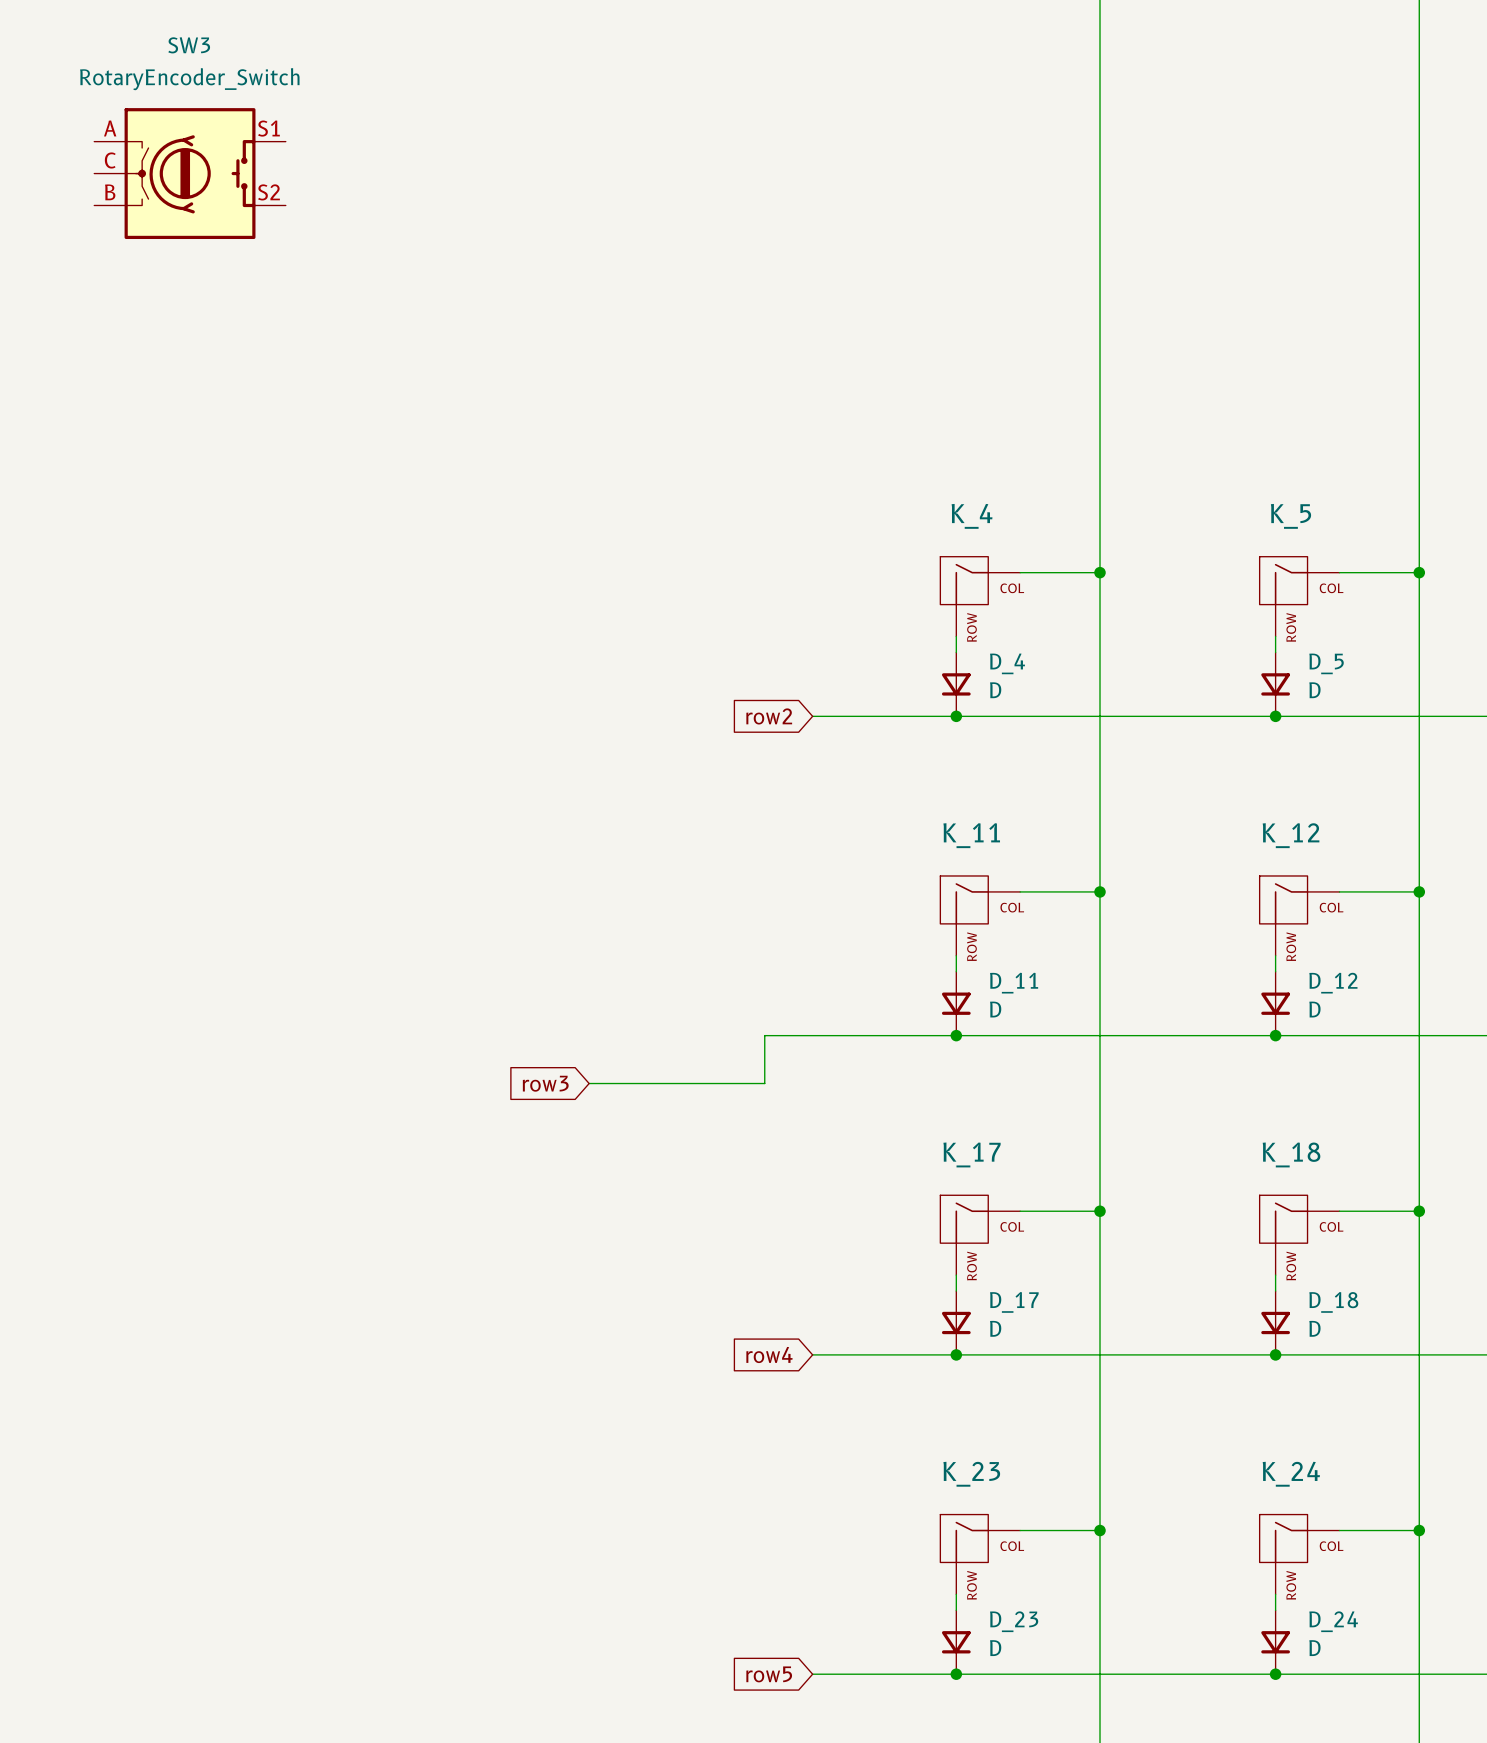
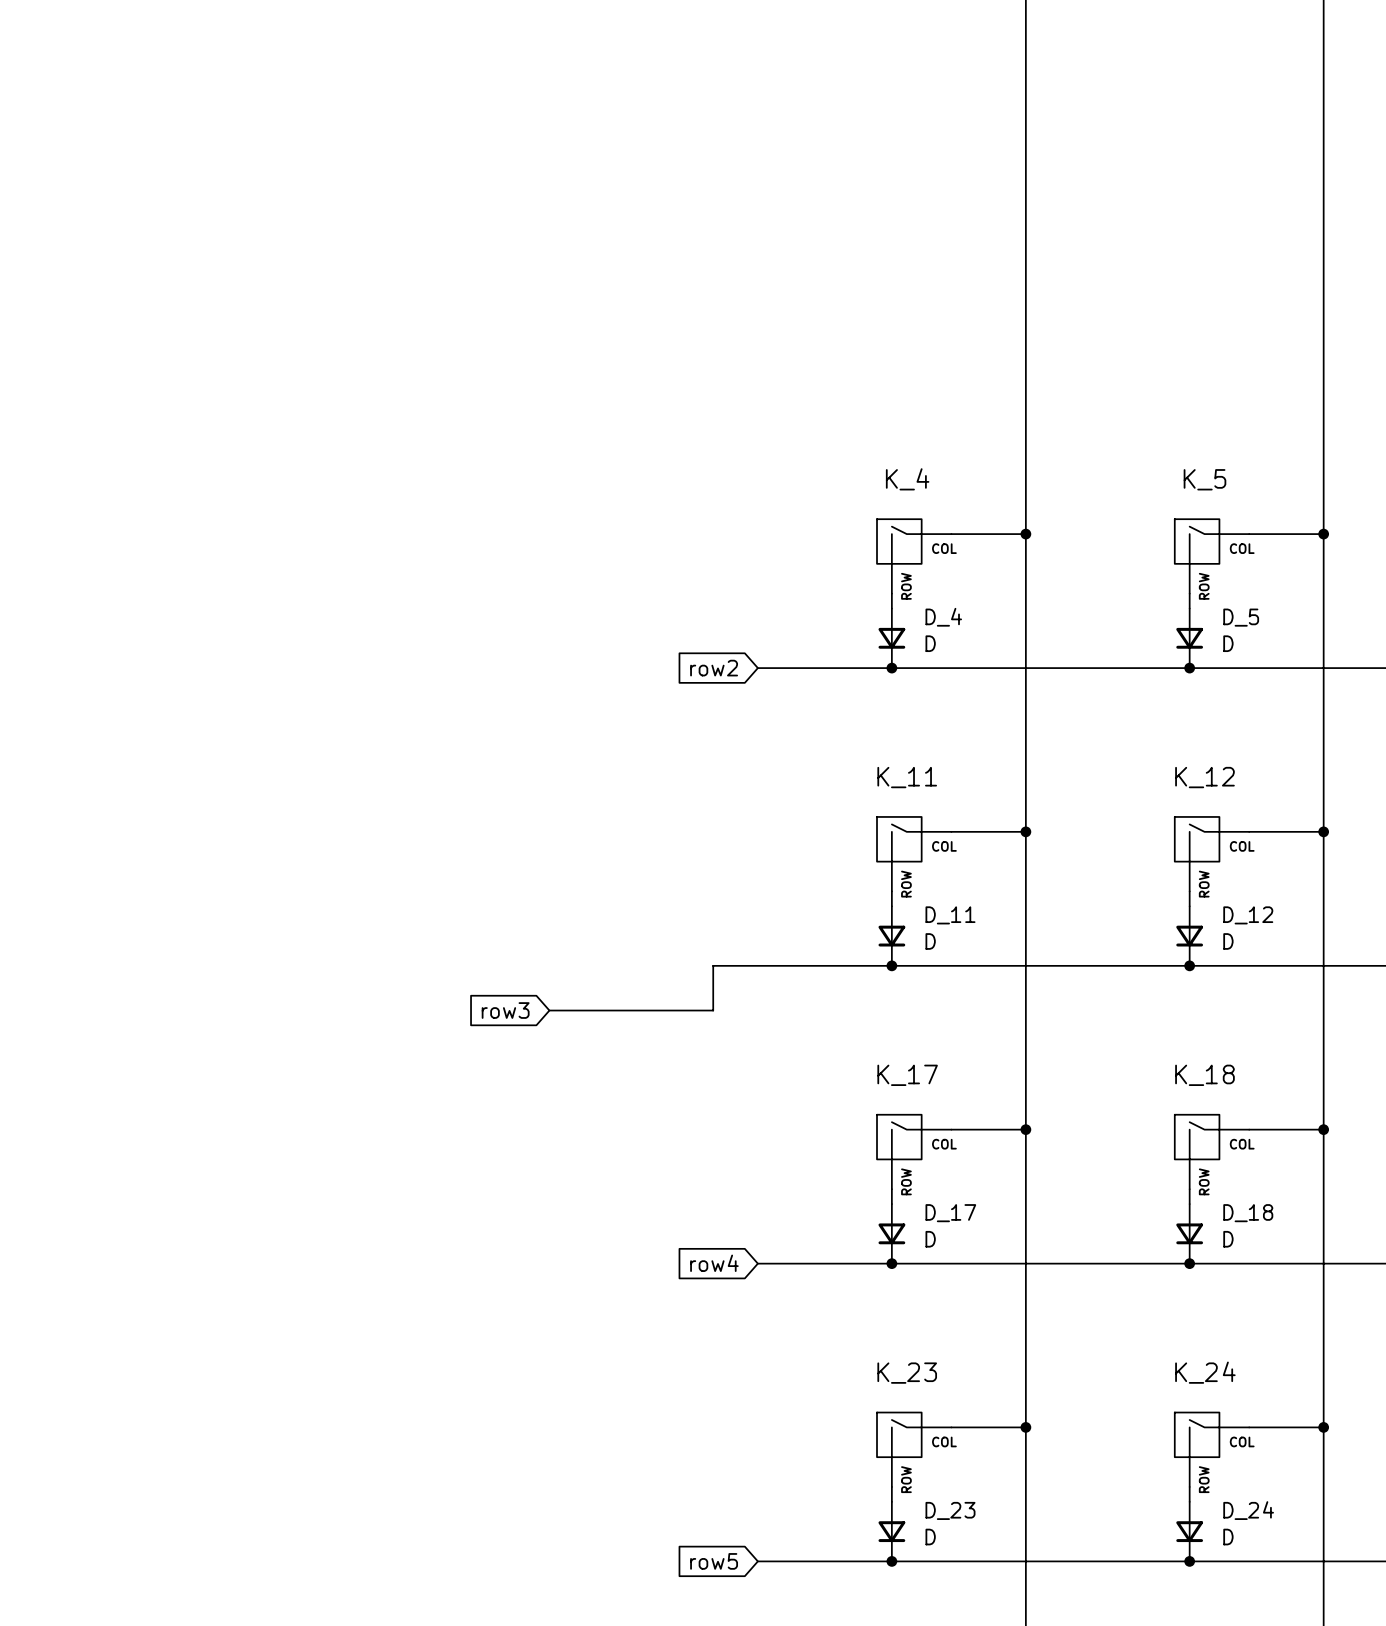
SW3: RotaryEncoder_Switch (190, 173) -> none

